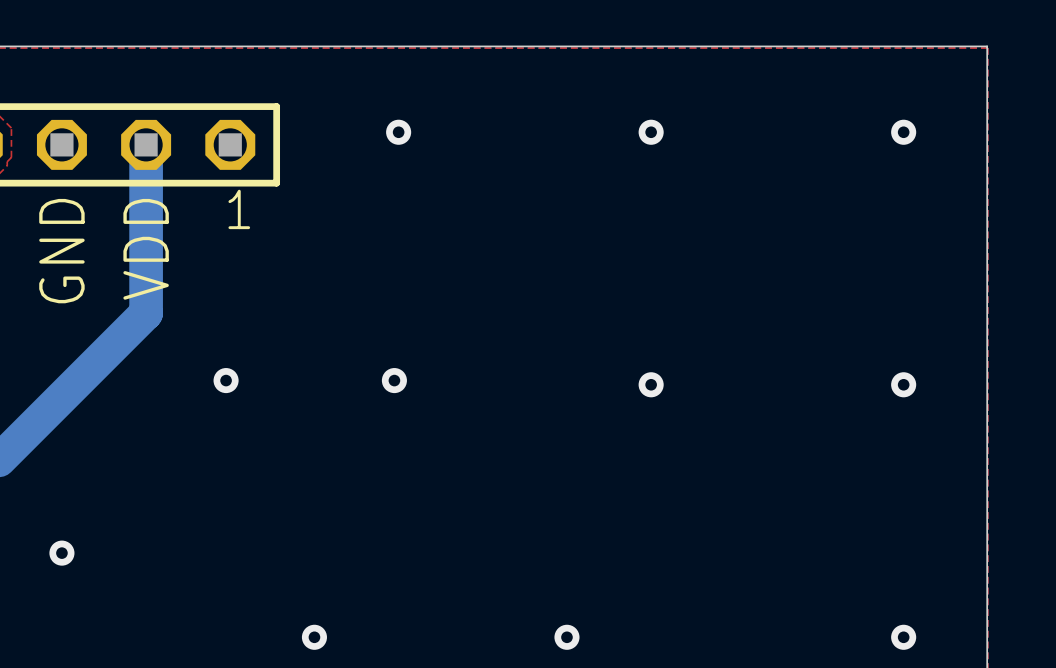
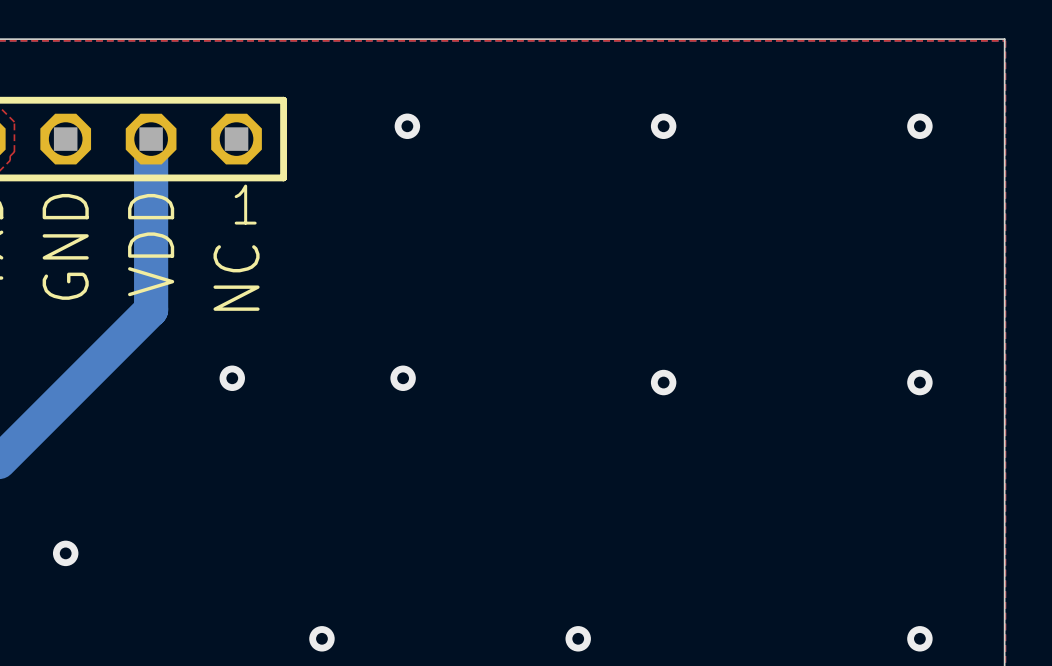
text: none -> NC (236, 278)

